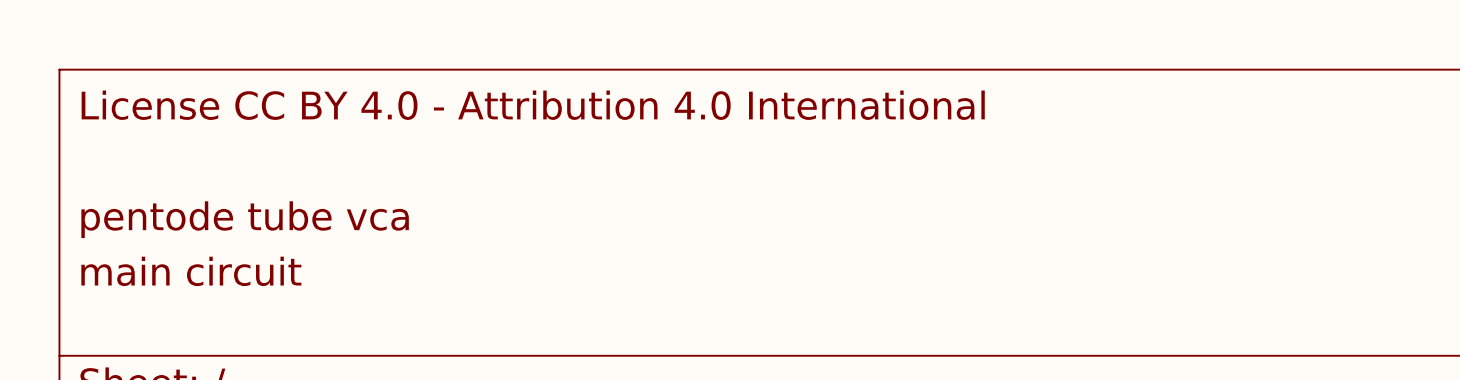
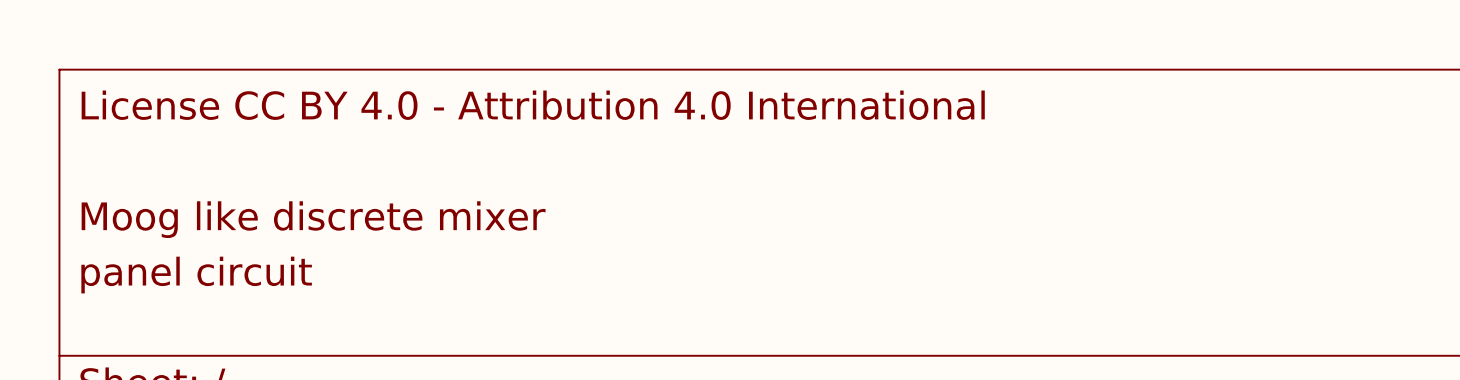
title block: pentode tube vca (245, 219) -> Moog like discrete mixer (313, 219)
title block: main circuit (191, 271) -> panel circuit (196, 275)

